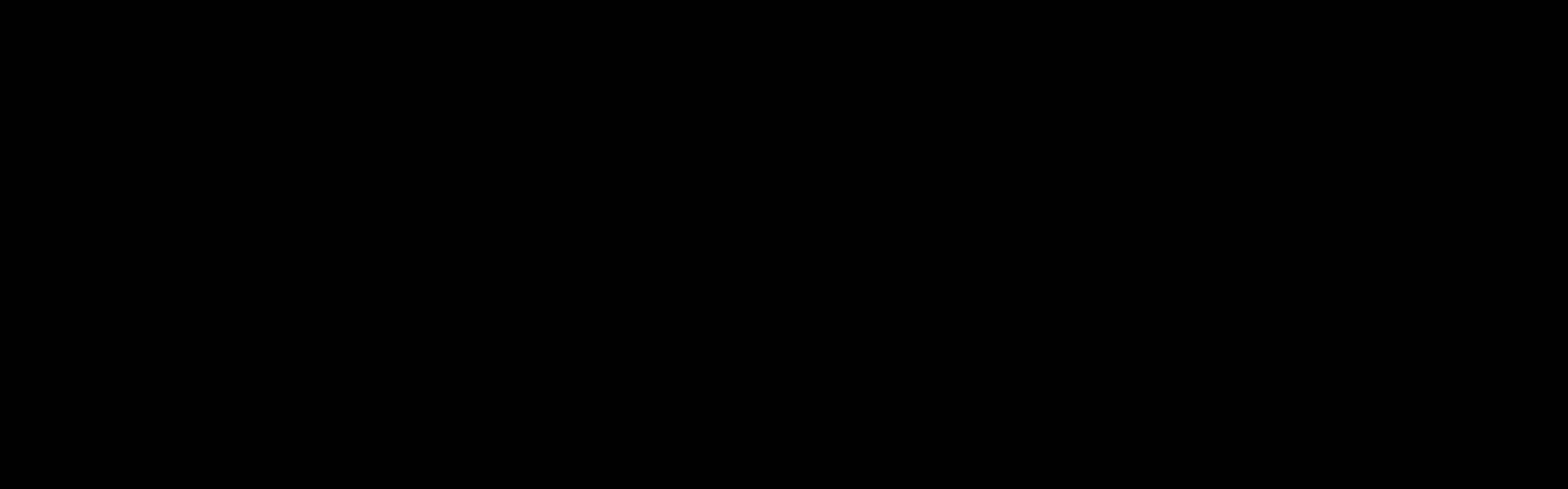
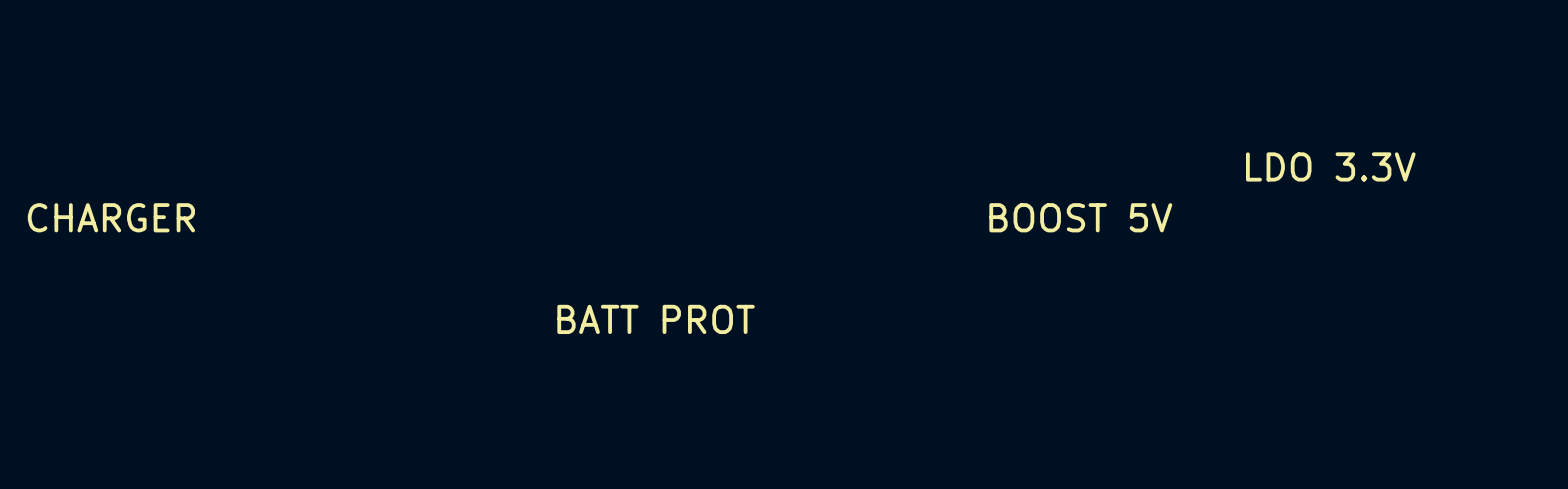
text: none -> LDO 3.3V (1330, 166)
text: none -> CHARGER (111, 217)
text: none -> BOOST 5V (1080, 217)
text: none -> BATT PROT (656, 319)

